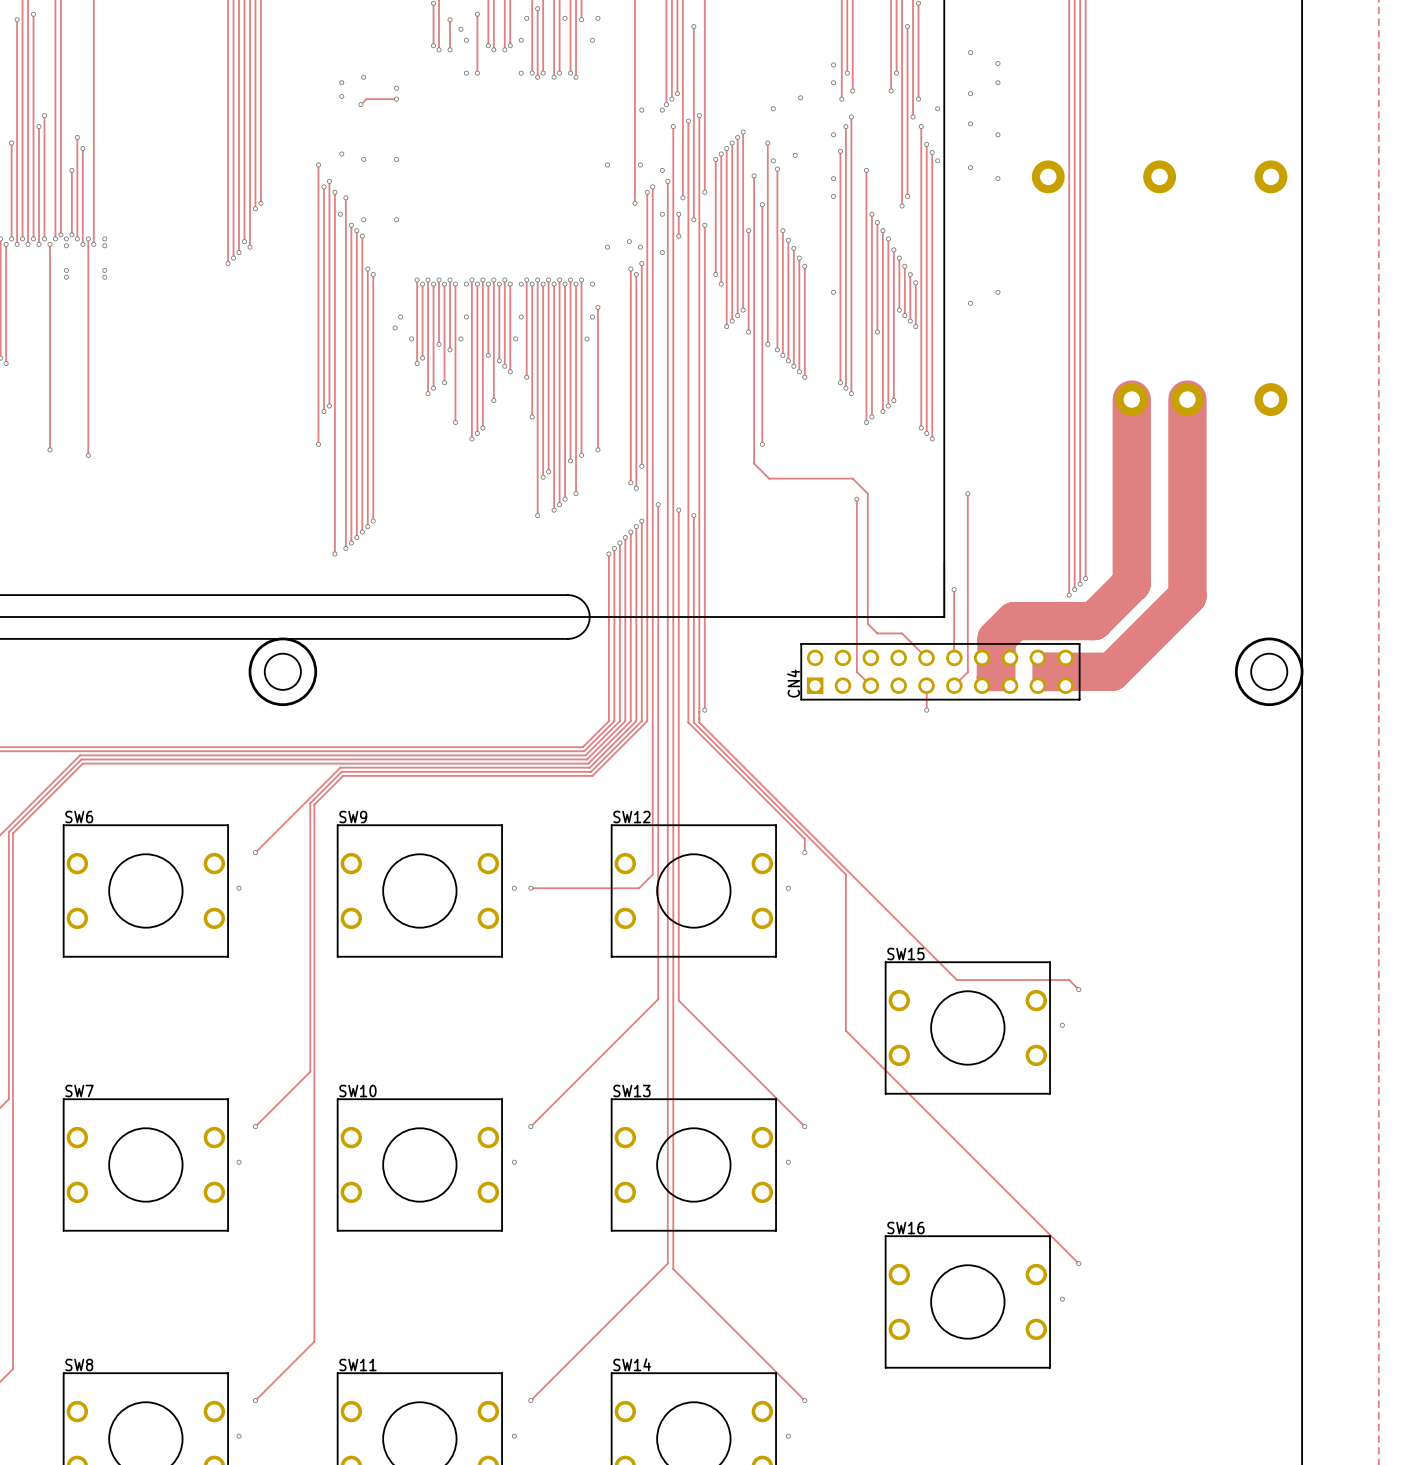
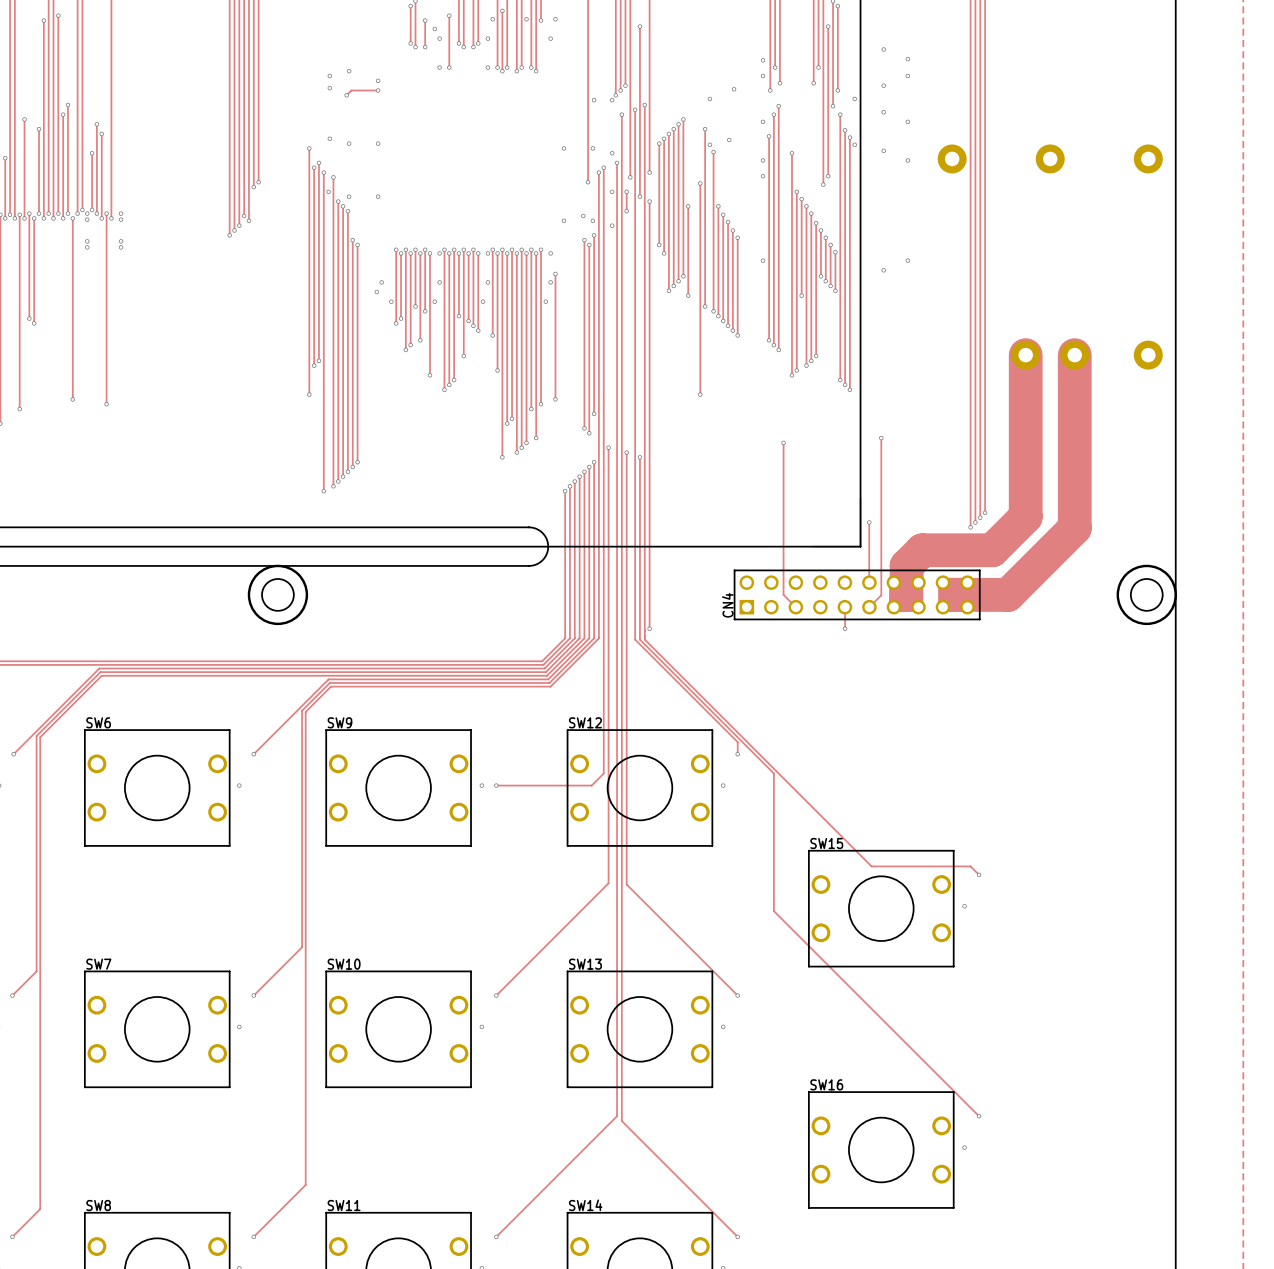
track: (754, 175) (754, 463) (769, 478) (852, 478) (867, 493) (867, 623) (877, 633) (902, 633) (926, 657) -> none
via: (754, 175) -> none

